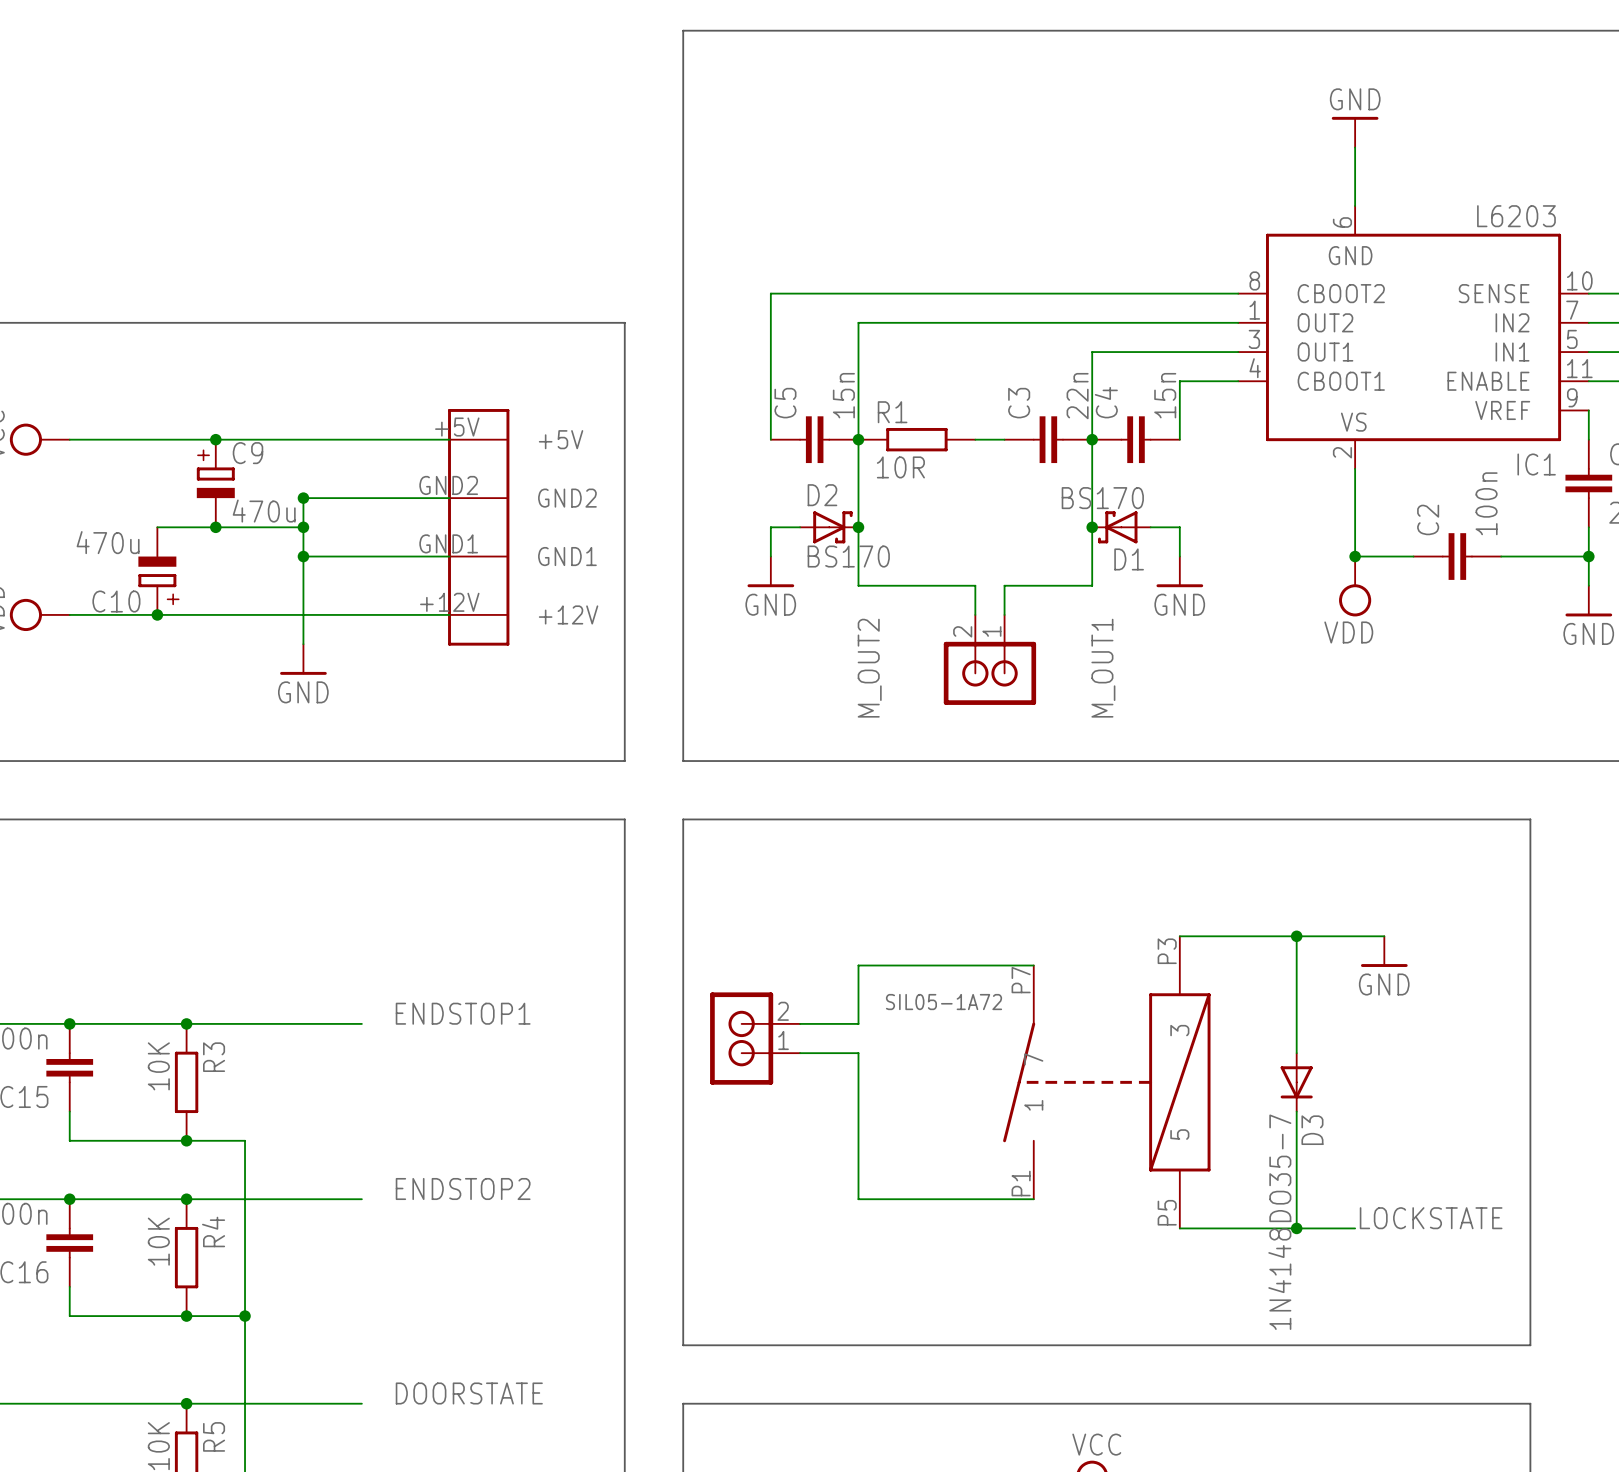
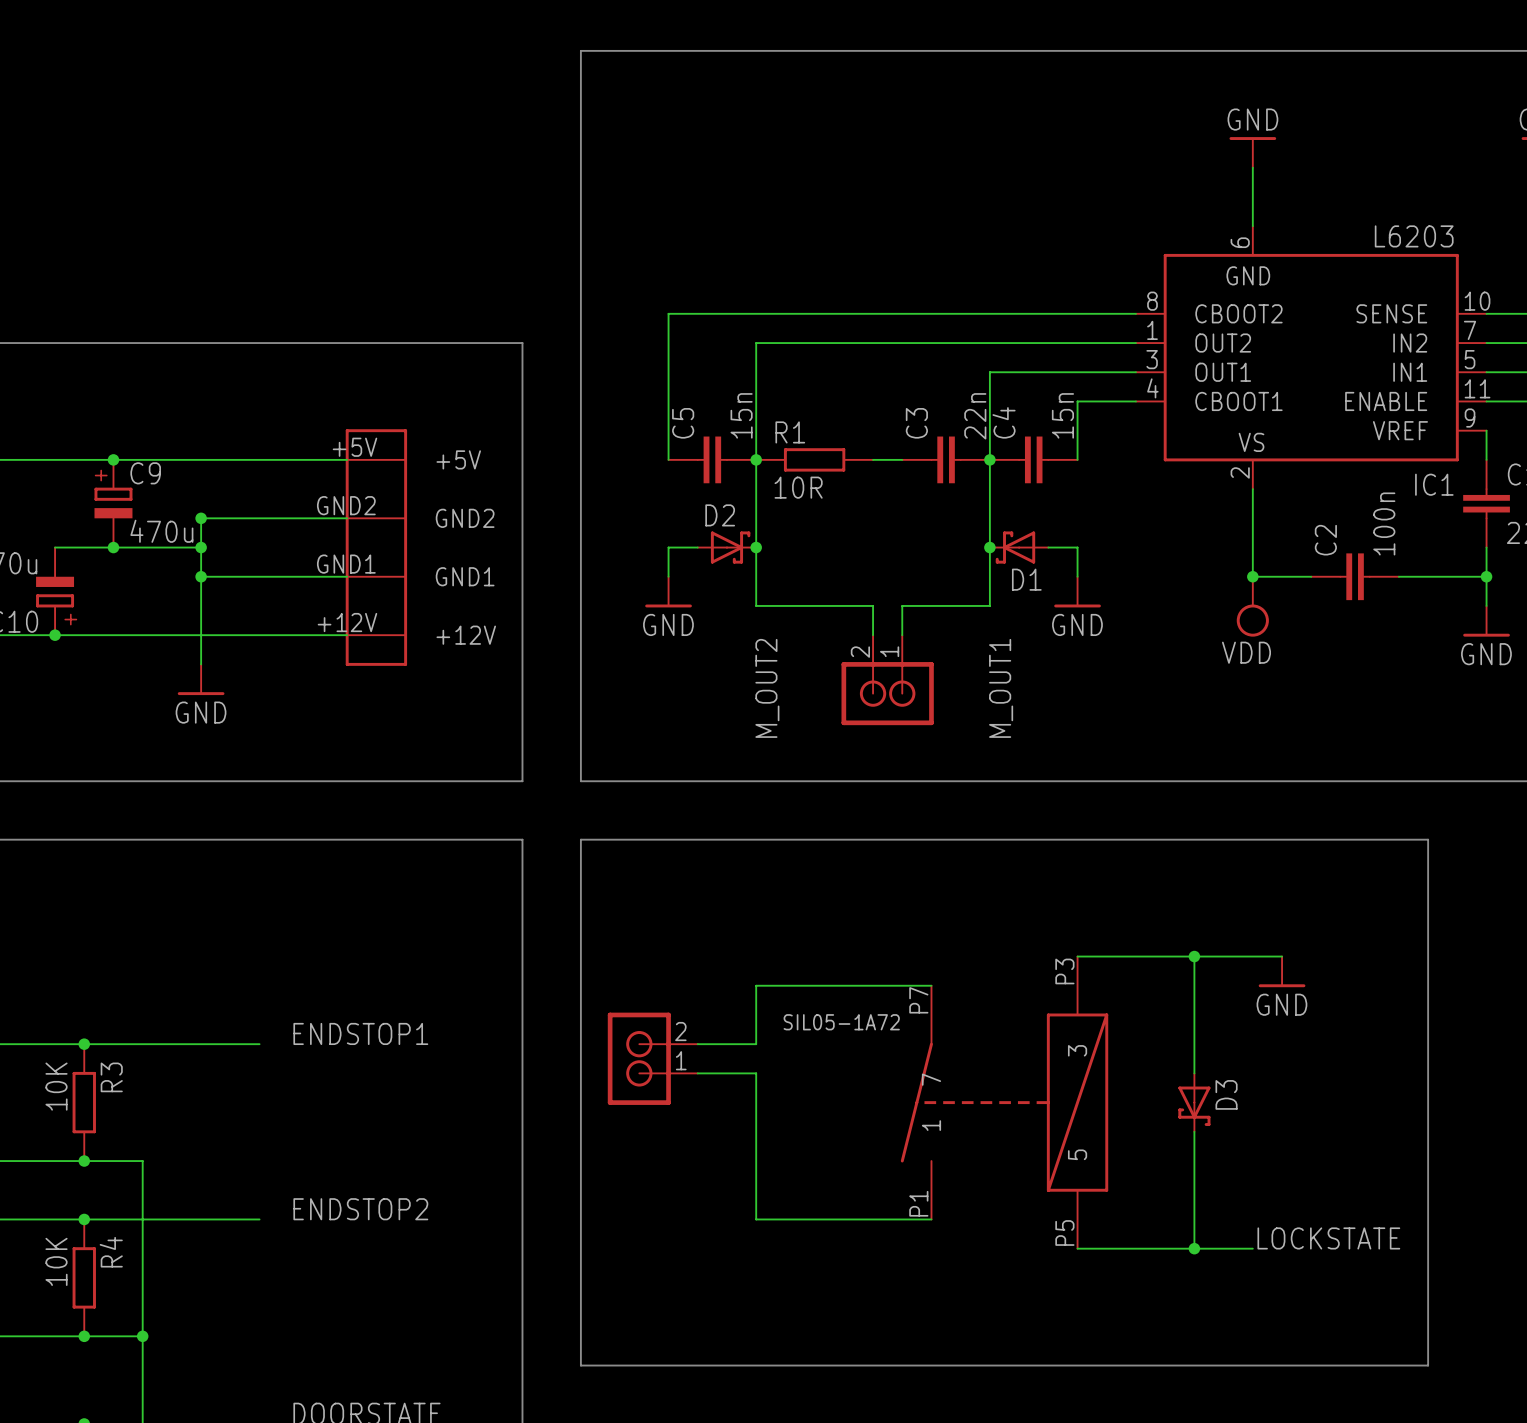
D1 value: BS170 (1102, 498) -> none
D2 value: BS170 (848, 556) -> none
D3 symbol: [1280, 1053, 1313, 1112] -> [1178, 1073, 1211, 1132]
D3 name position: D3 (1312, 1130) -> D3 (1226, 1094)
D3 value: 1N4148DO35-7 (1279, 1222) -> none

